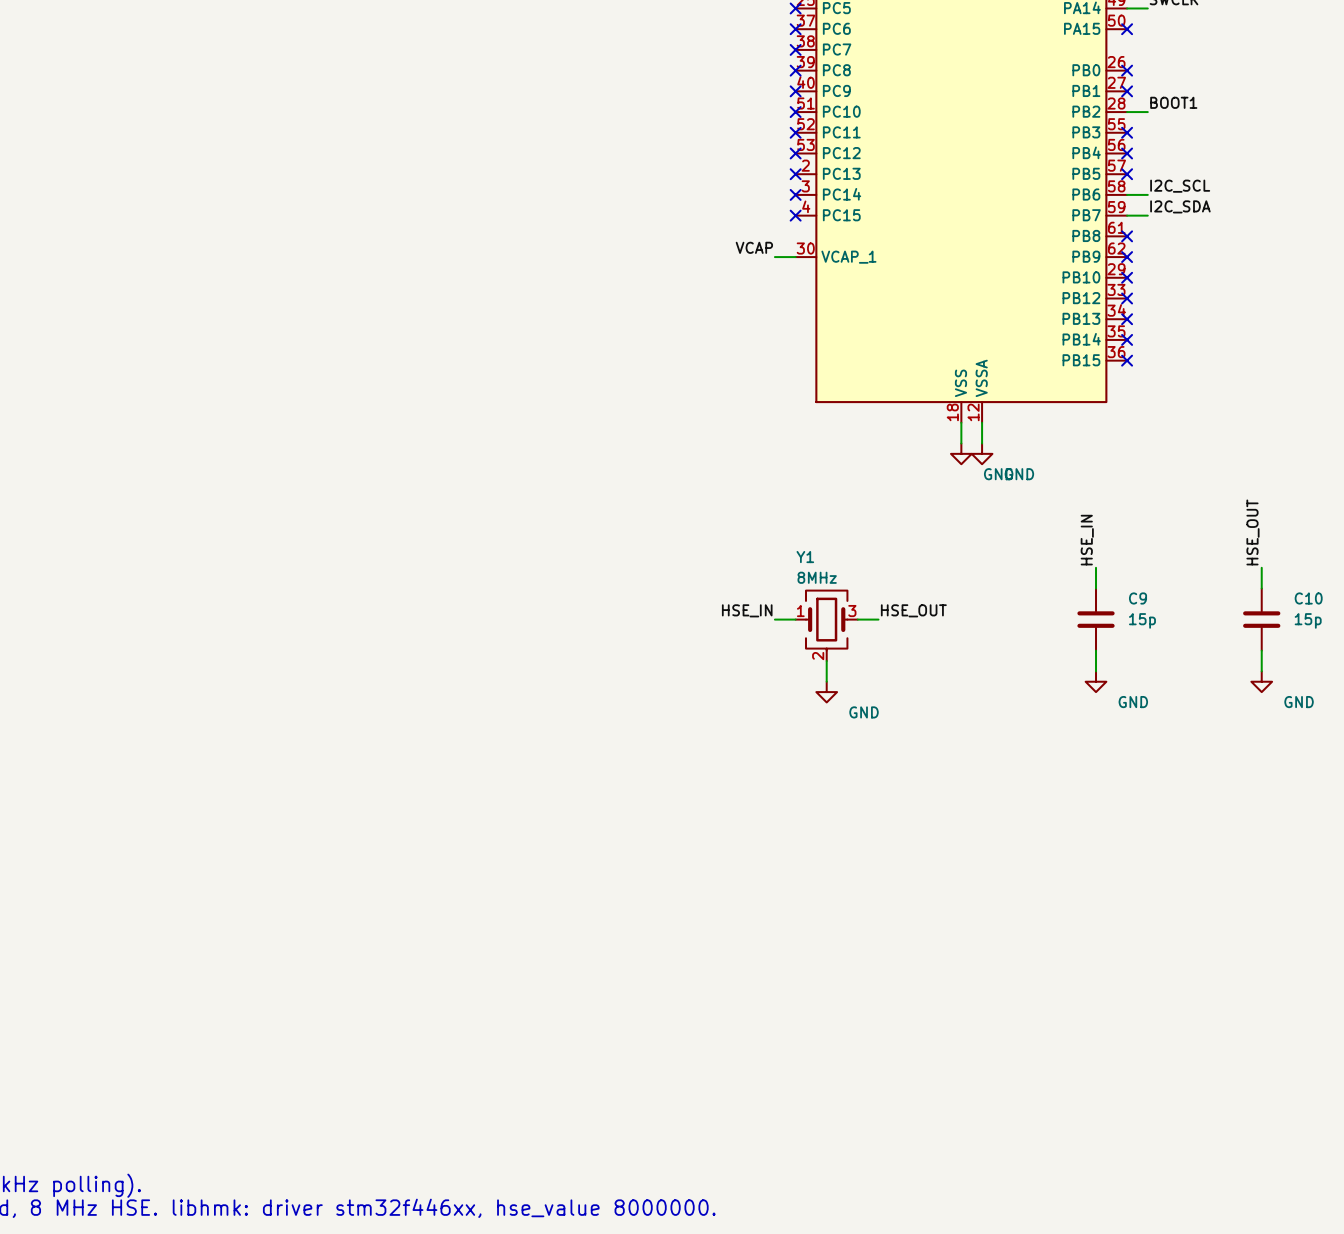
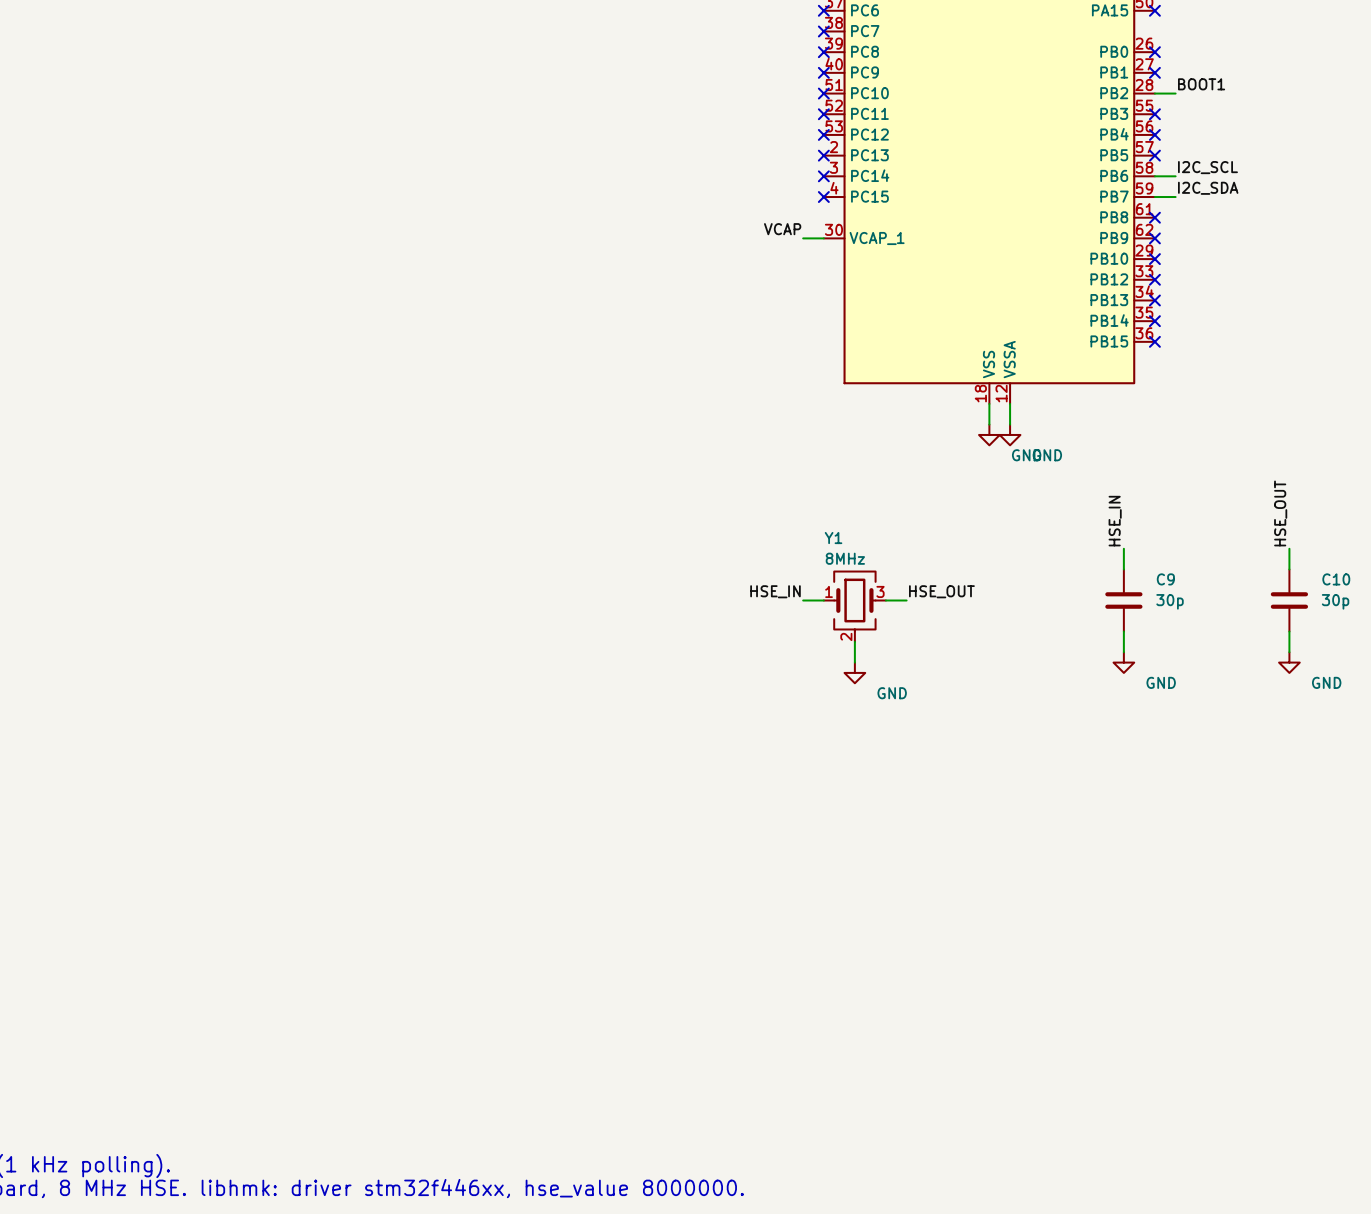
C9 value: 15p (1142, 620) -> 30p (1170, 601)
C10 value: 15p (1308, 620) -> 30p (1335, 601)

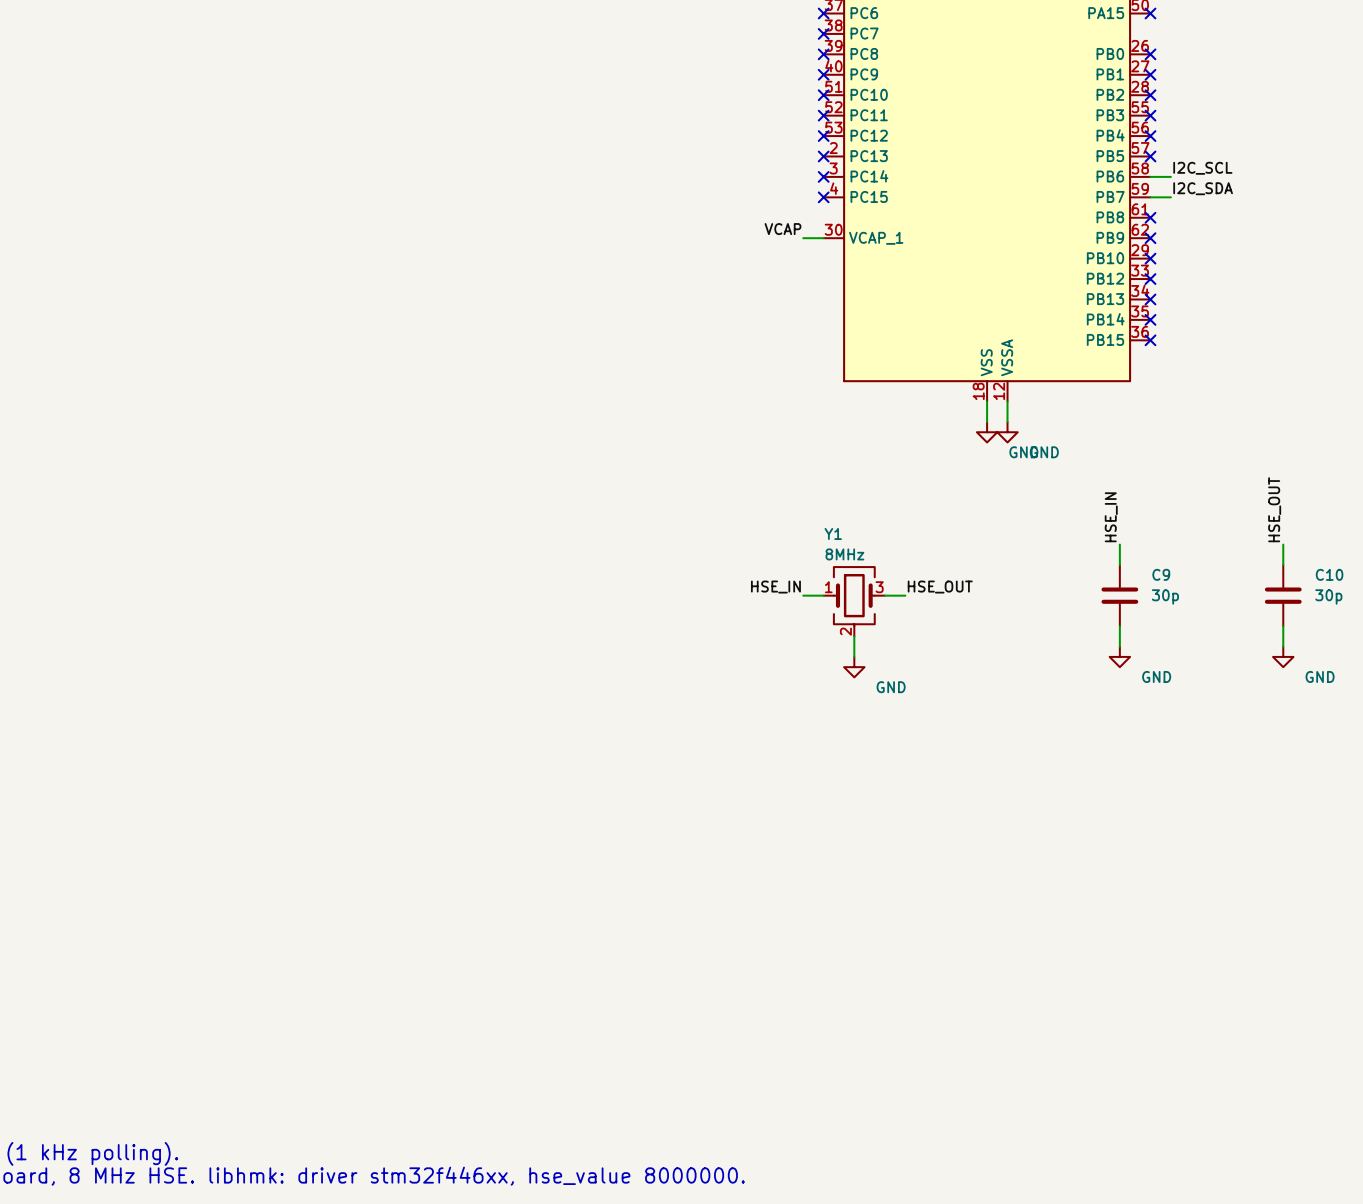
label: BOOT1 (1201, 84) -> none
wire: (1154, 93) (1175, 93) -> none
no-connect mark: none -> (1150, 95)

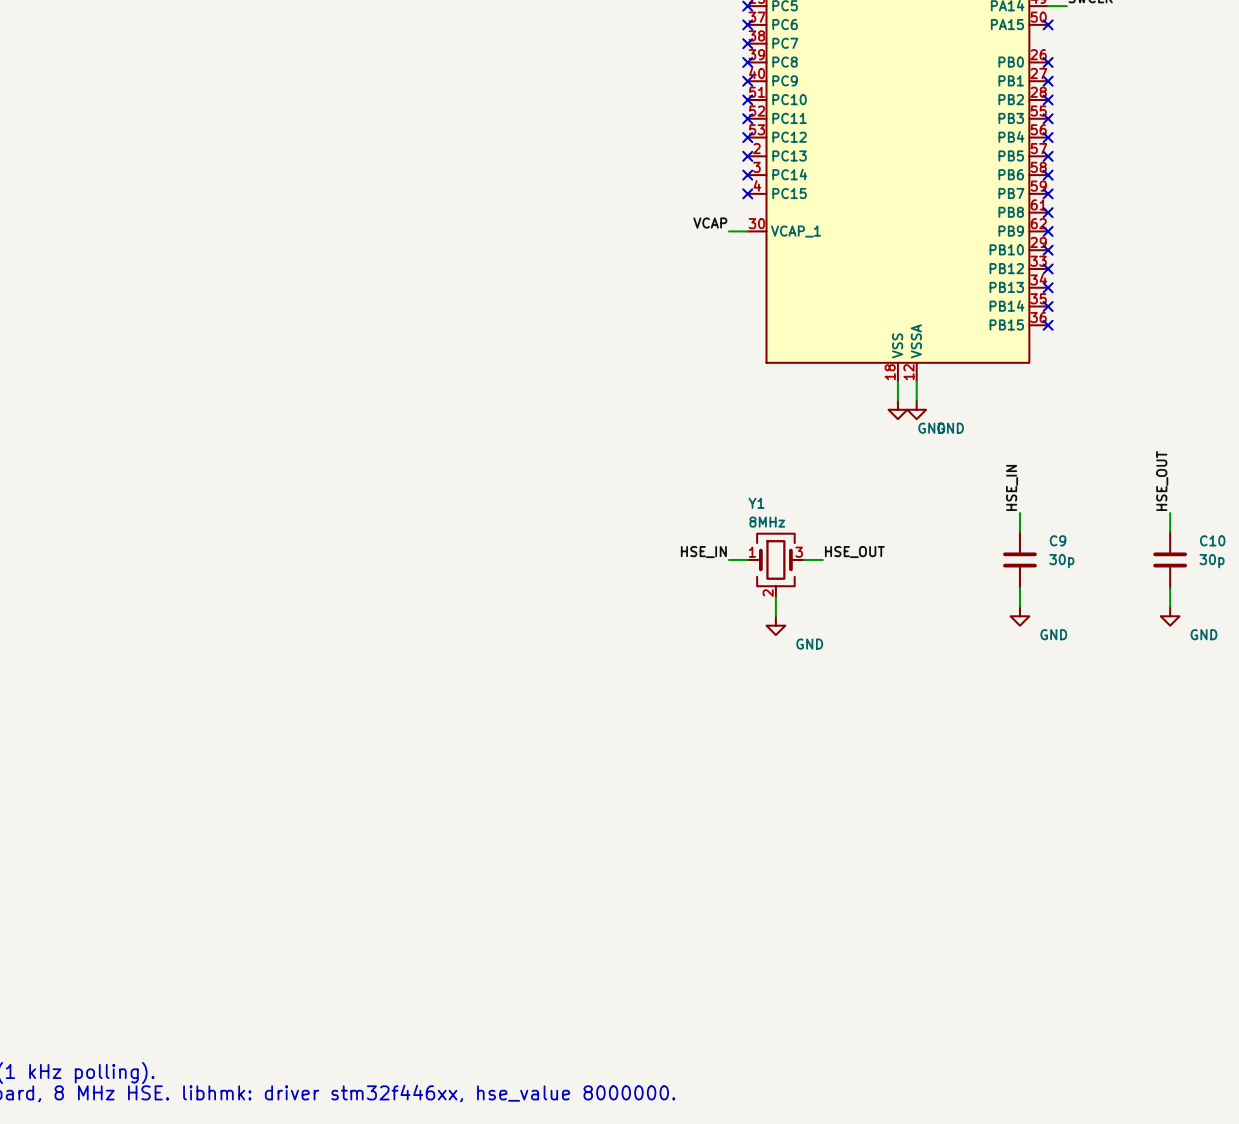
label: I2C_SCL (1202, 168) -> none
wire: (1150, 176) (1170, 176) -> none
no-connect mark: none -> (1048, 175)
label: I2C_SDA (1203, 188) -> none
wire: (1150, 197) (1170, 197) -> none
no-connect mark: none -> (1048, 193)

